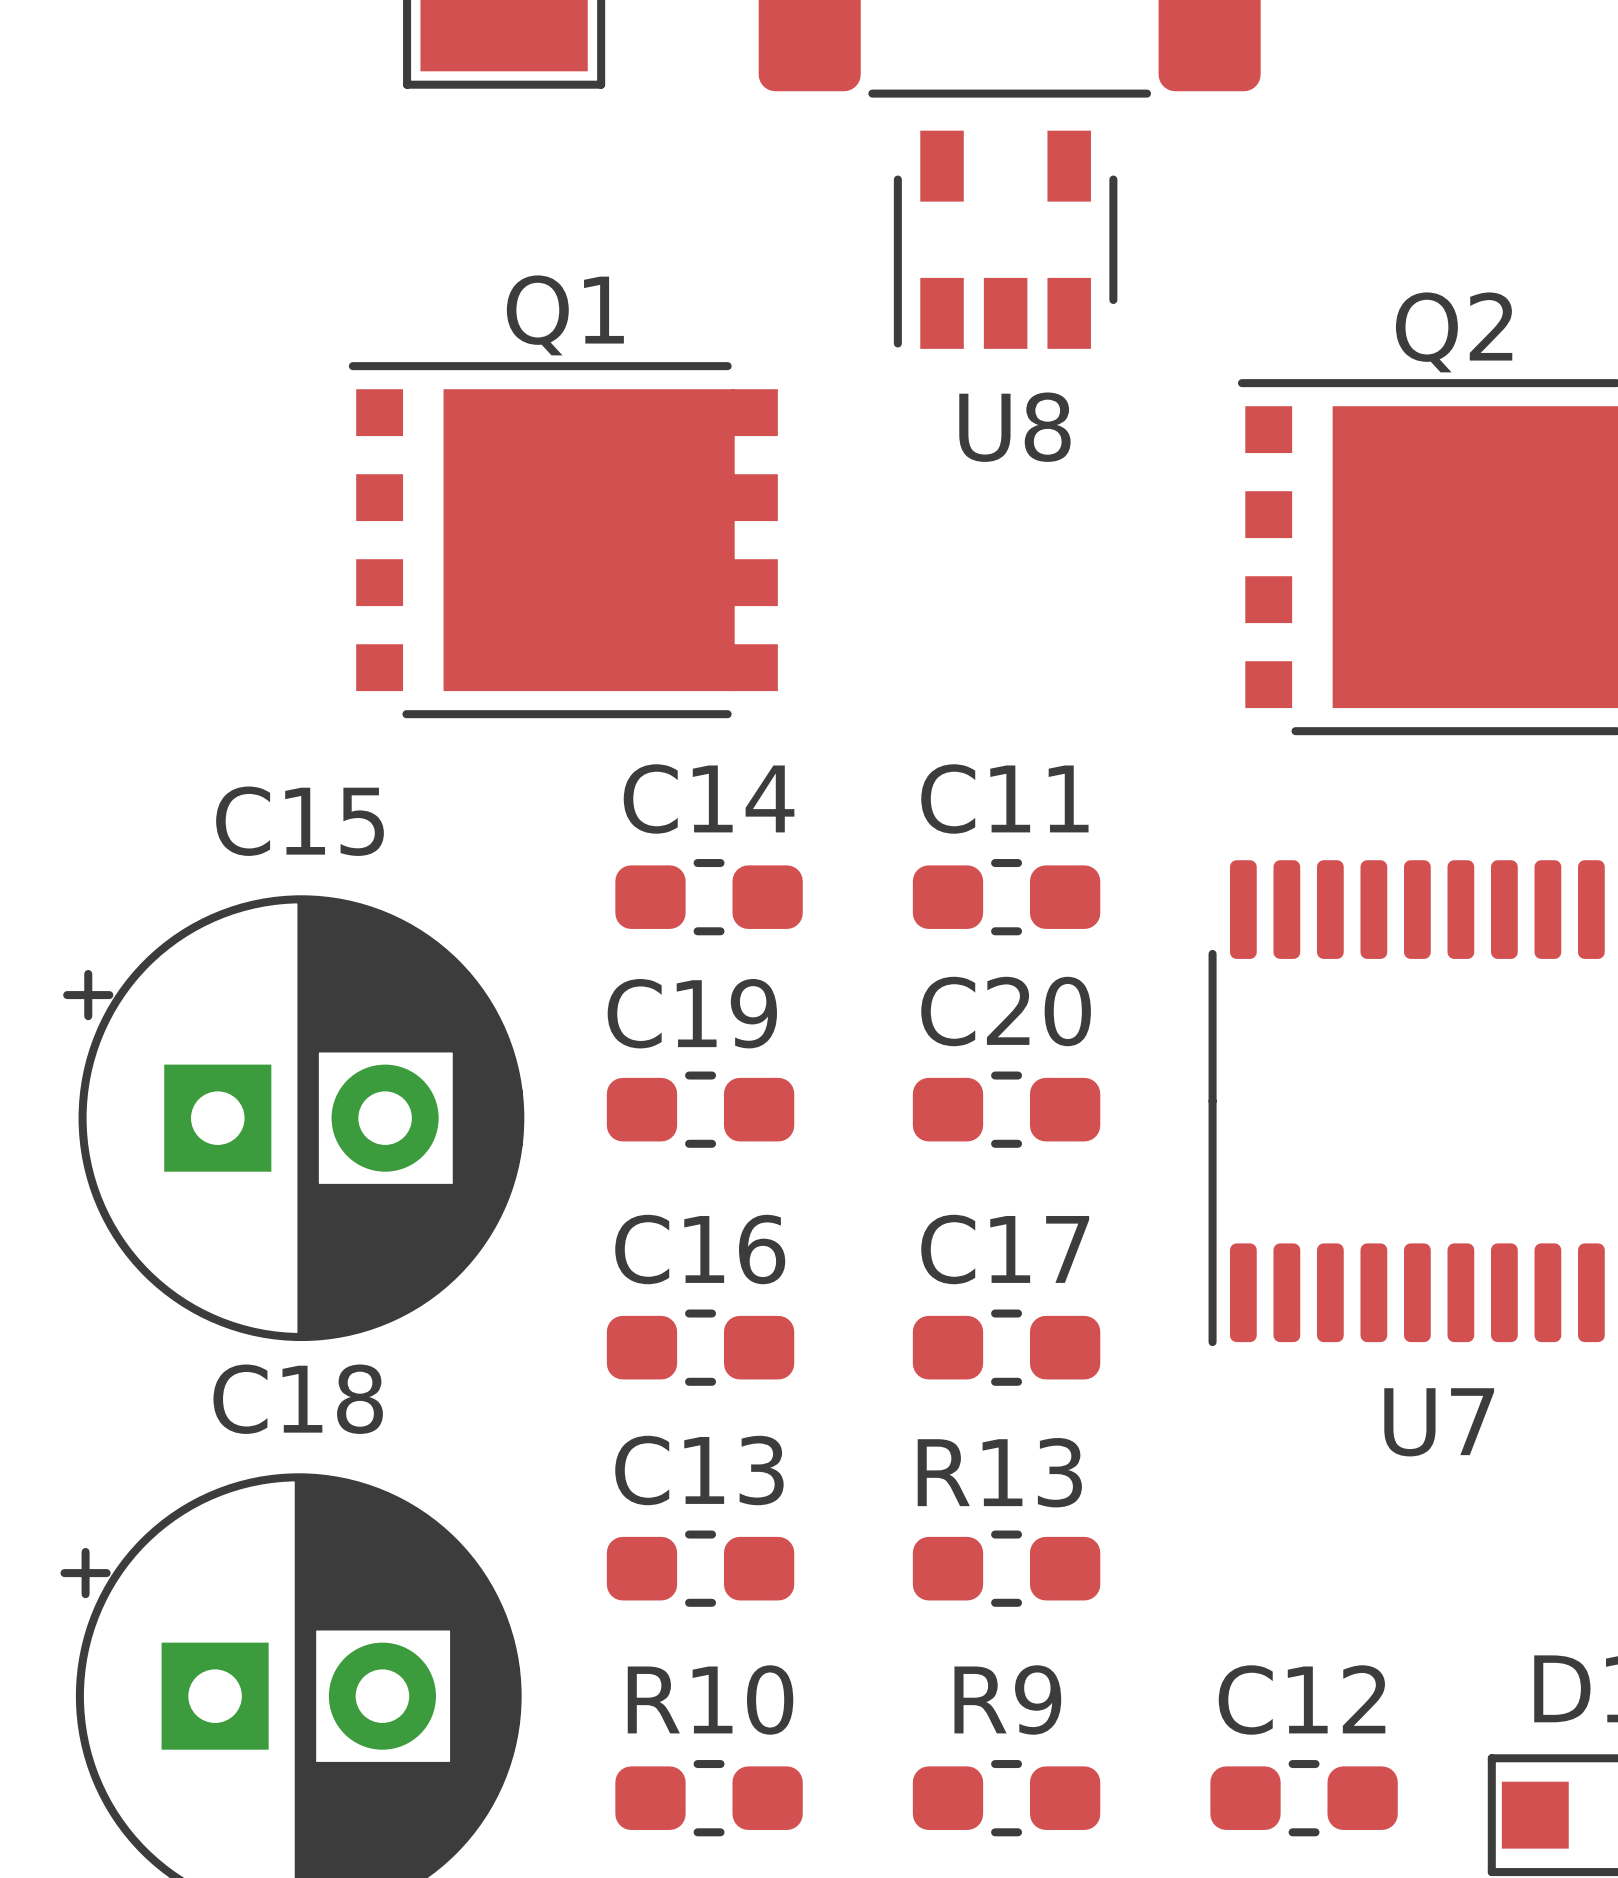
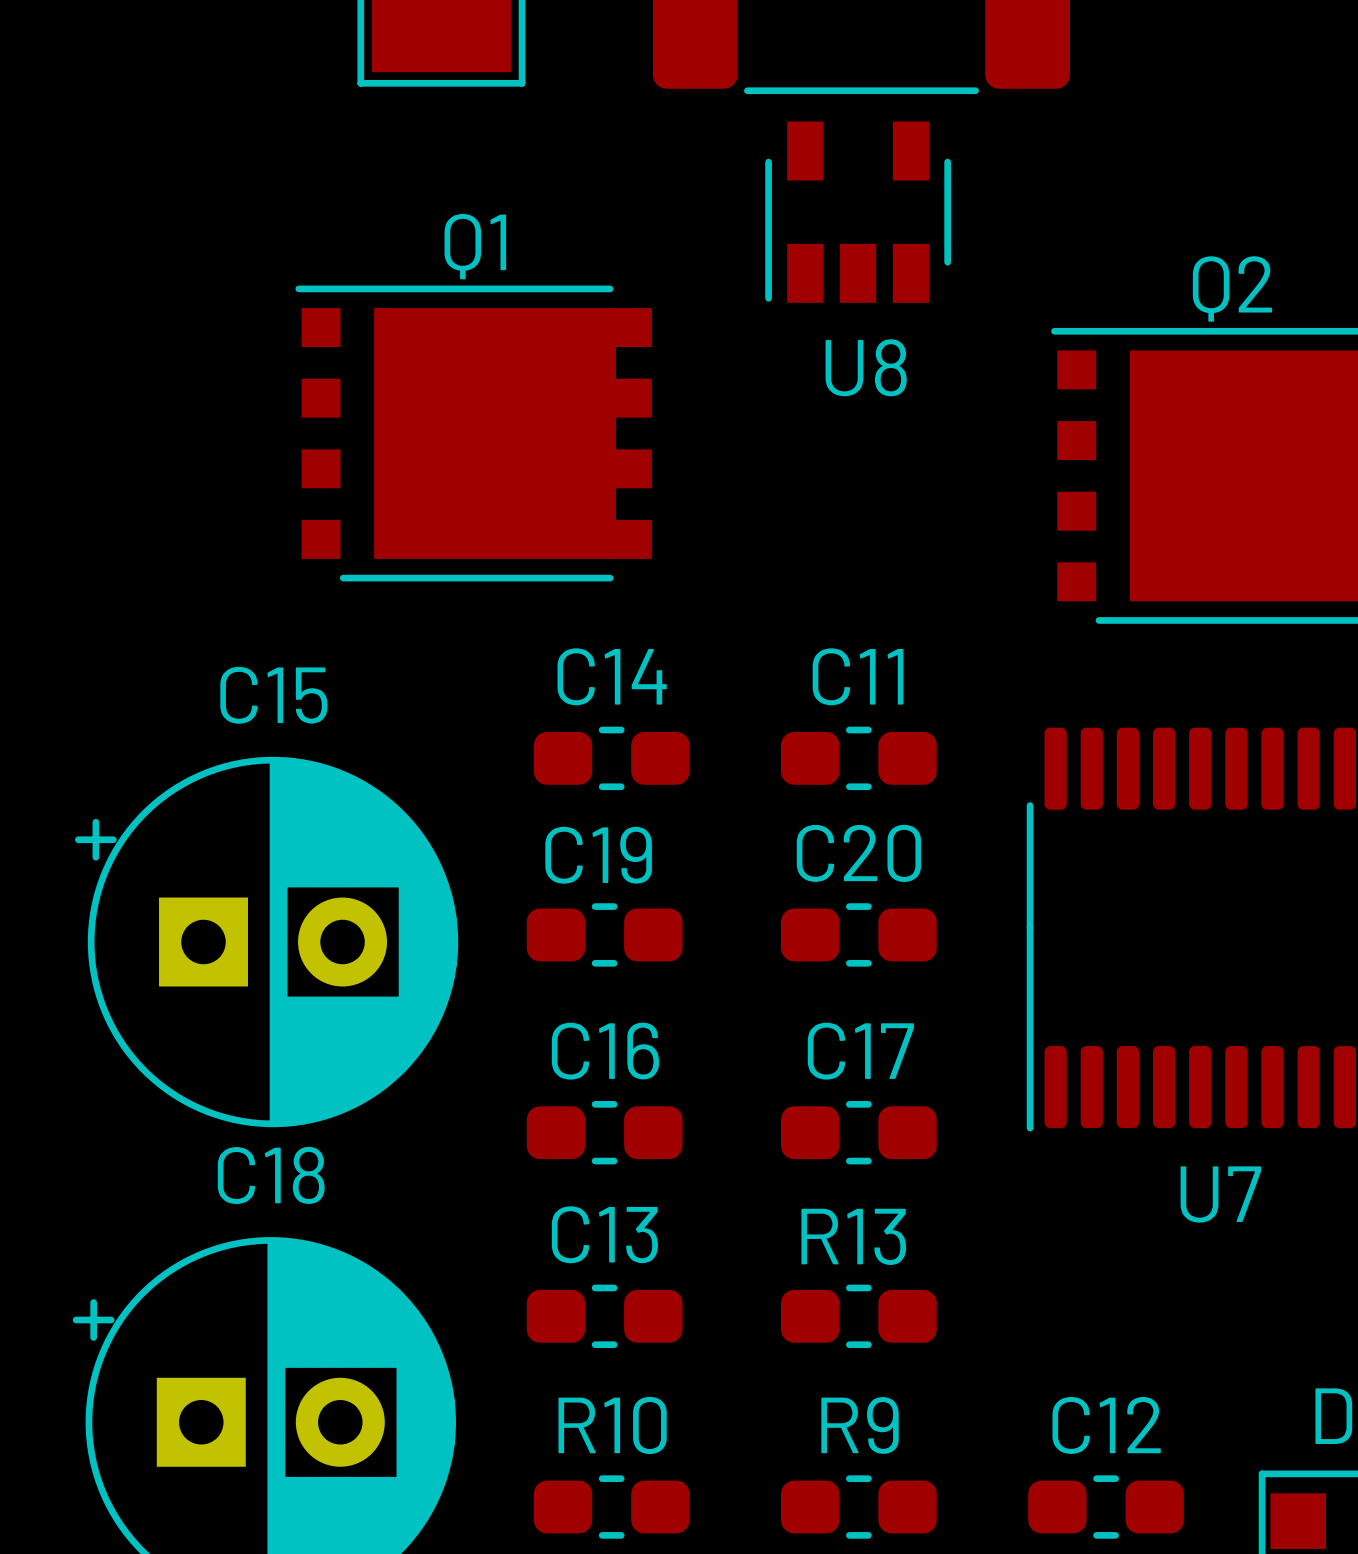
Q1 position: (563, 540) -> (473, 433)

